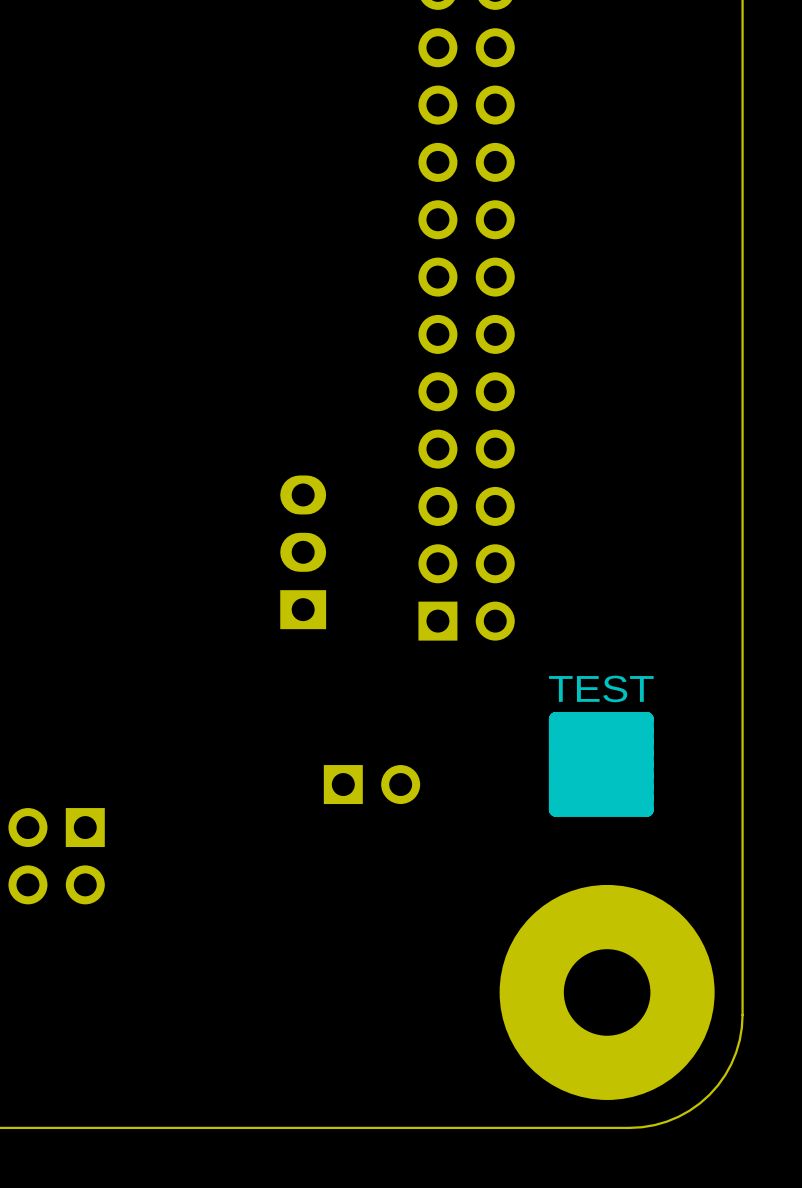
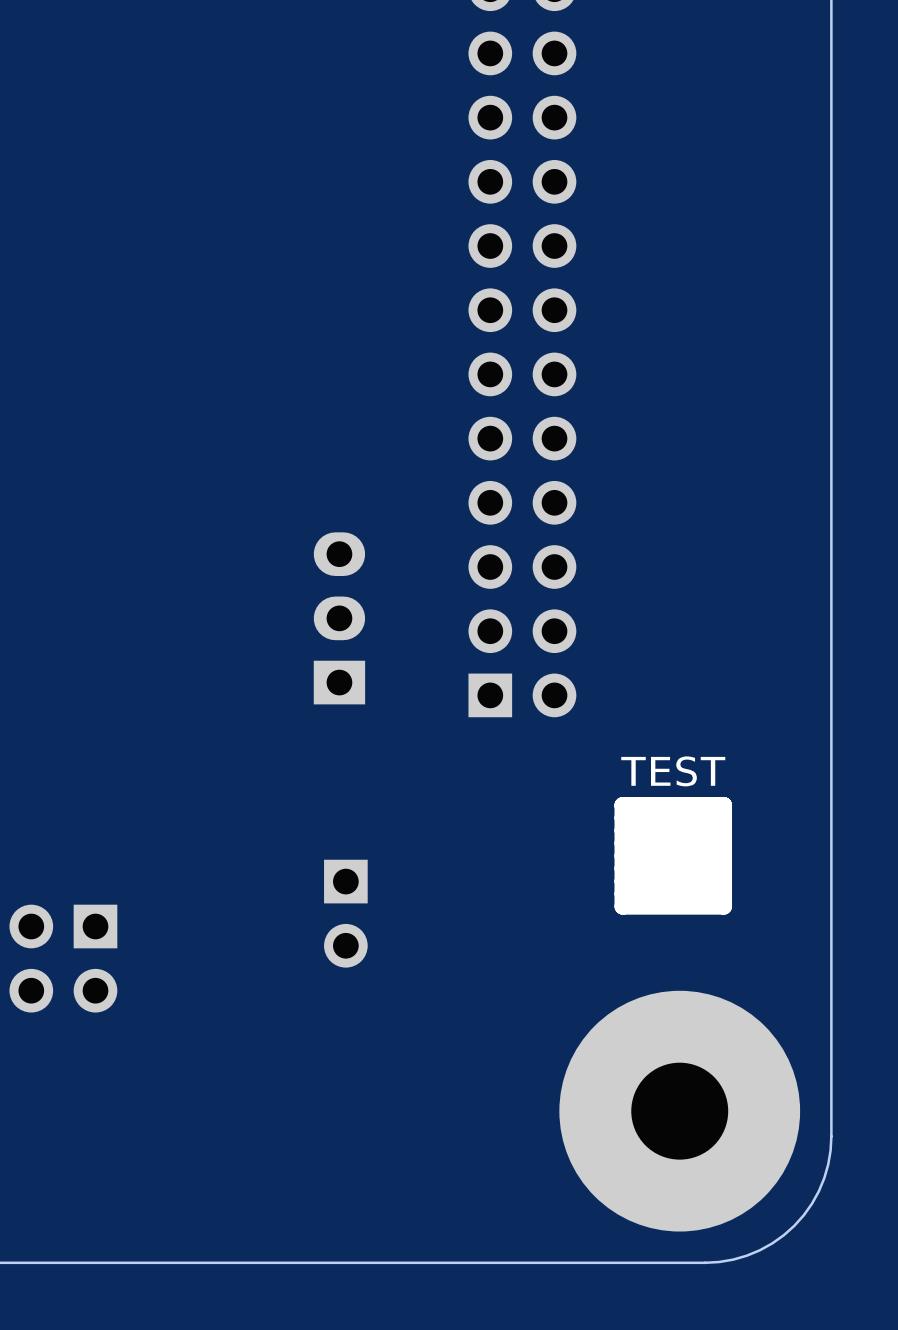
part rotation: 0° (371, 784) -> 90° clockwise (345, 913)
part position: (371, 784) -> (345, 913)

